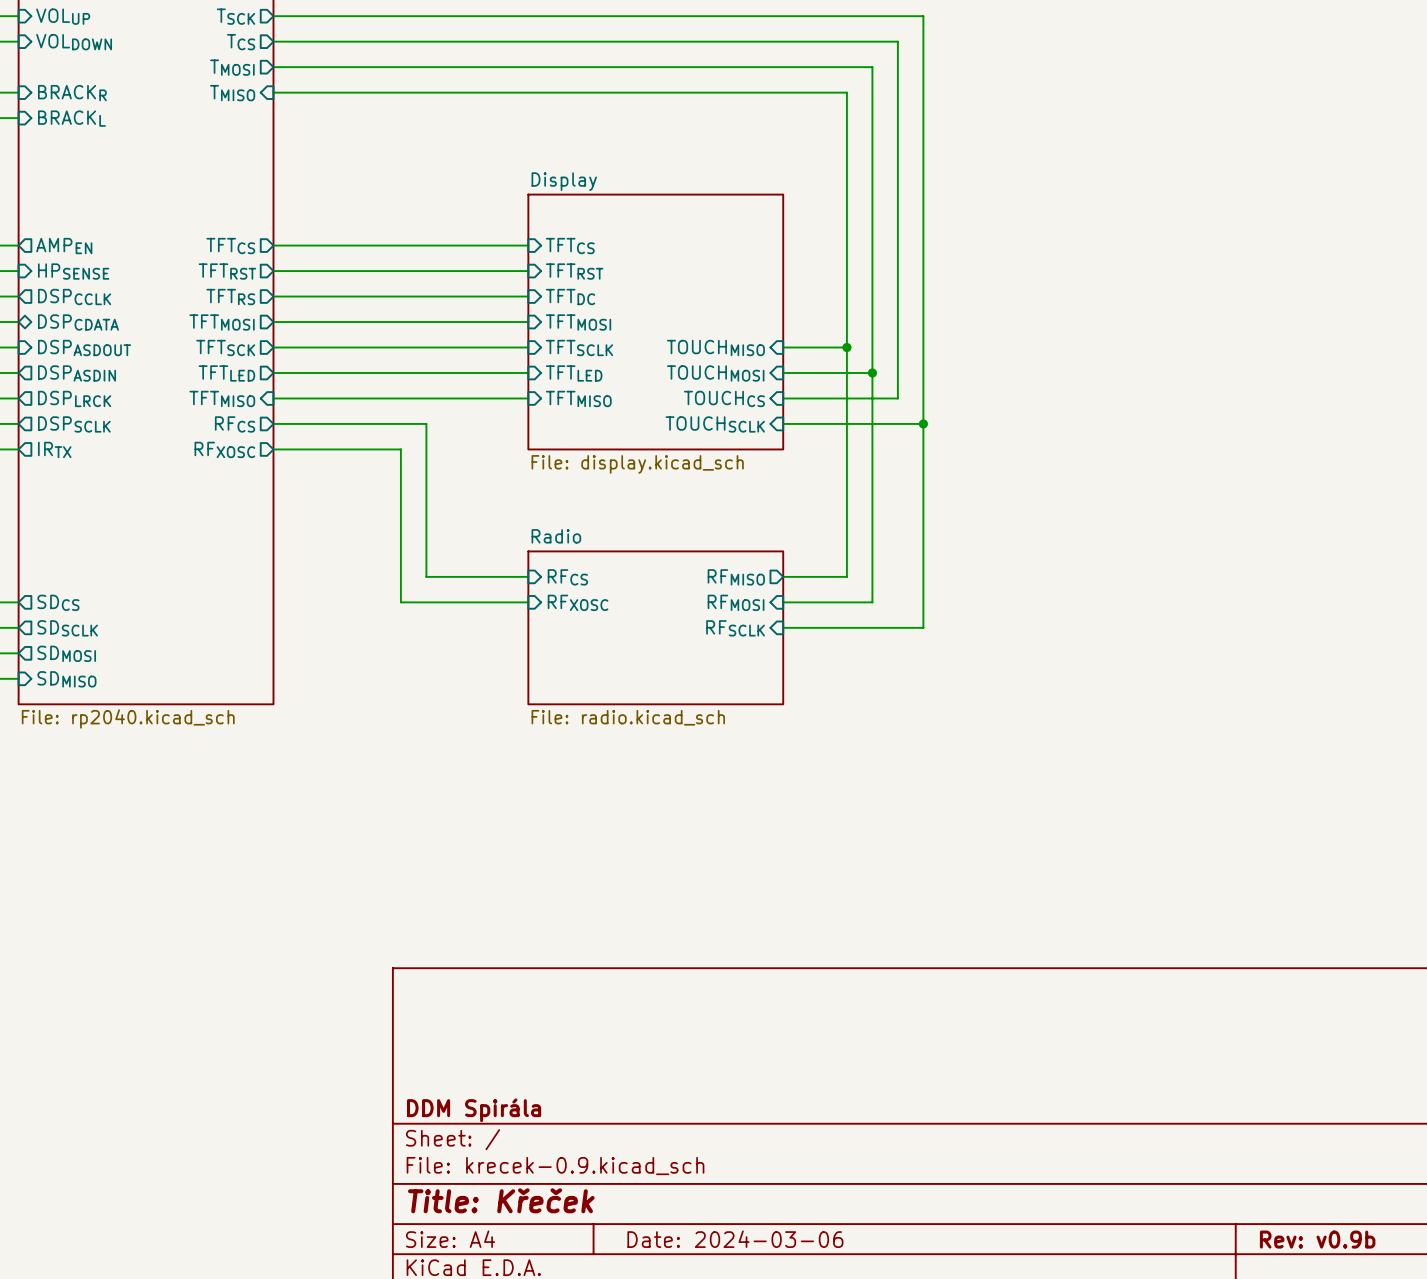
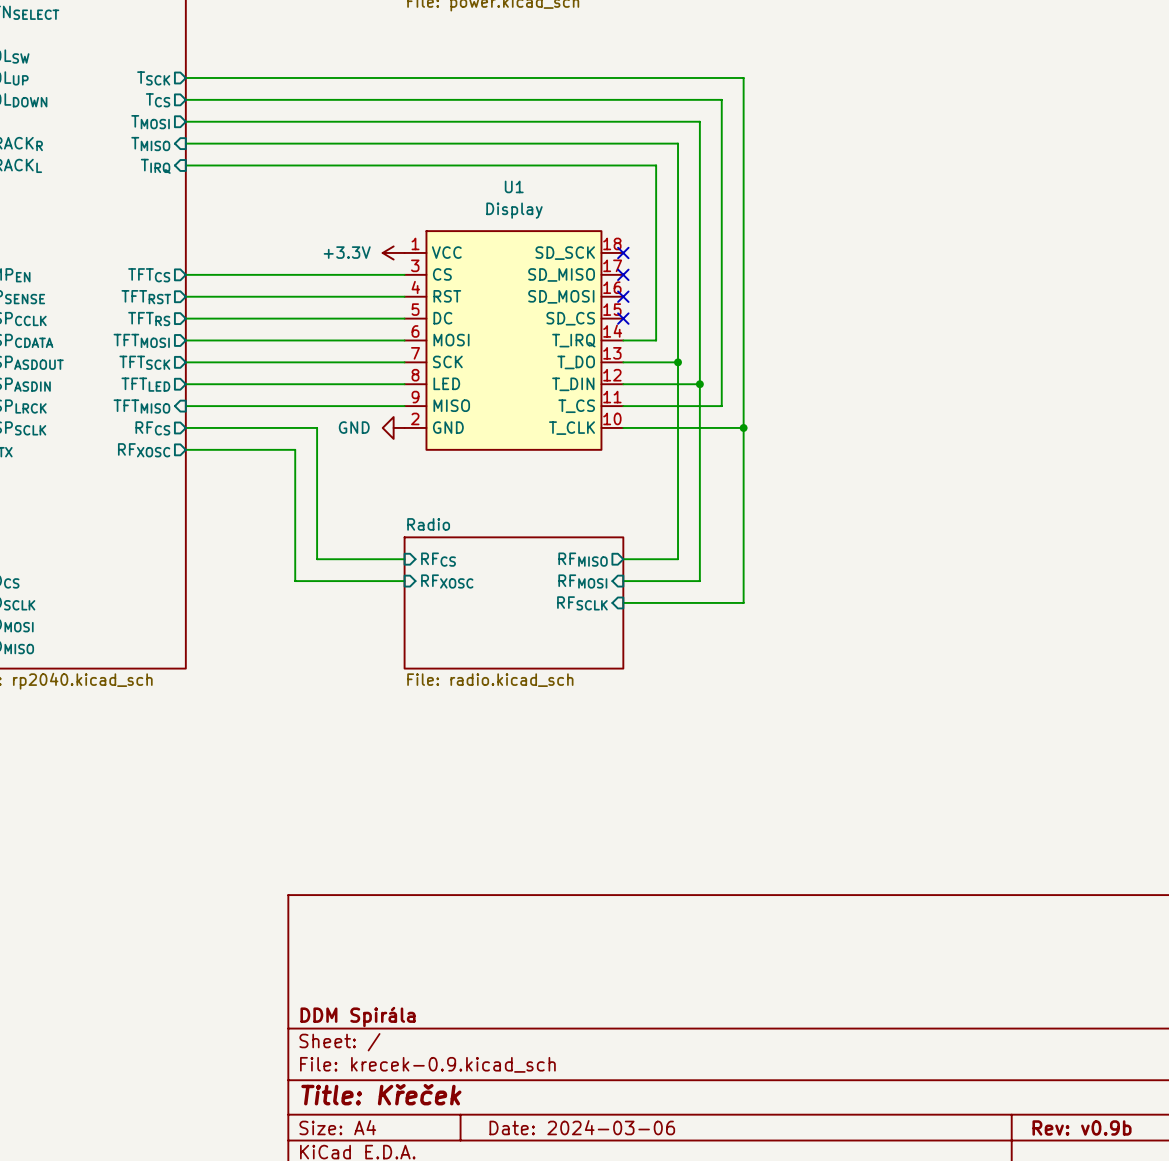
wire: none -> (185, 165) (656, 165) (656, 340) (623, 340)
sheet pin: none -> TIRQ (155, 166)
power symbol: none -> +3.3V (393, 252)
no-connect mark: none -> (623, 252)
no-connect mark: none -> (623, 274)
sheet pin: TFTCS (570, 246) -> none
sheet pin: TFTRST (574, 271) -> none
no-connect mark: none -> (623, 296)
no-connect mark: none -> (623, 318)
sheet pin: TFTDC (570, 297) -> none
sheet pin: TFTMOSI (578, 322) -> none
sheet Display: File: display.kicad_sch (655, 322) -> none
U1: none -> Display (513, 340)
sheet pin: TFTSCLK (579, 347) -> none
sheet pin: TOUCHMISO (715, 347) -> none
sheet pin: TFTLED (574, 373) -> none
sheet pin: TOUCHMOSI (715, 373) -> none
sheet pin: TFTMISO (578, 398) -> none
sheet pin: TOUCHCS (724, 398) -> none
power symbol: none -> GND (393, 427)
sheet pin: TOUCHSCLK (715, 424) -> none

